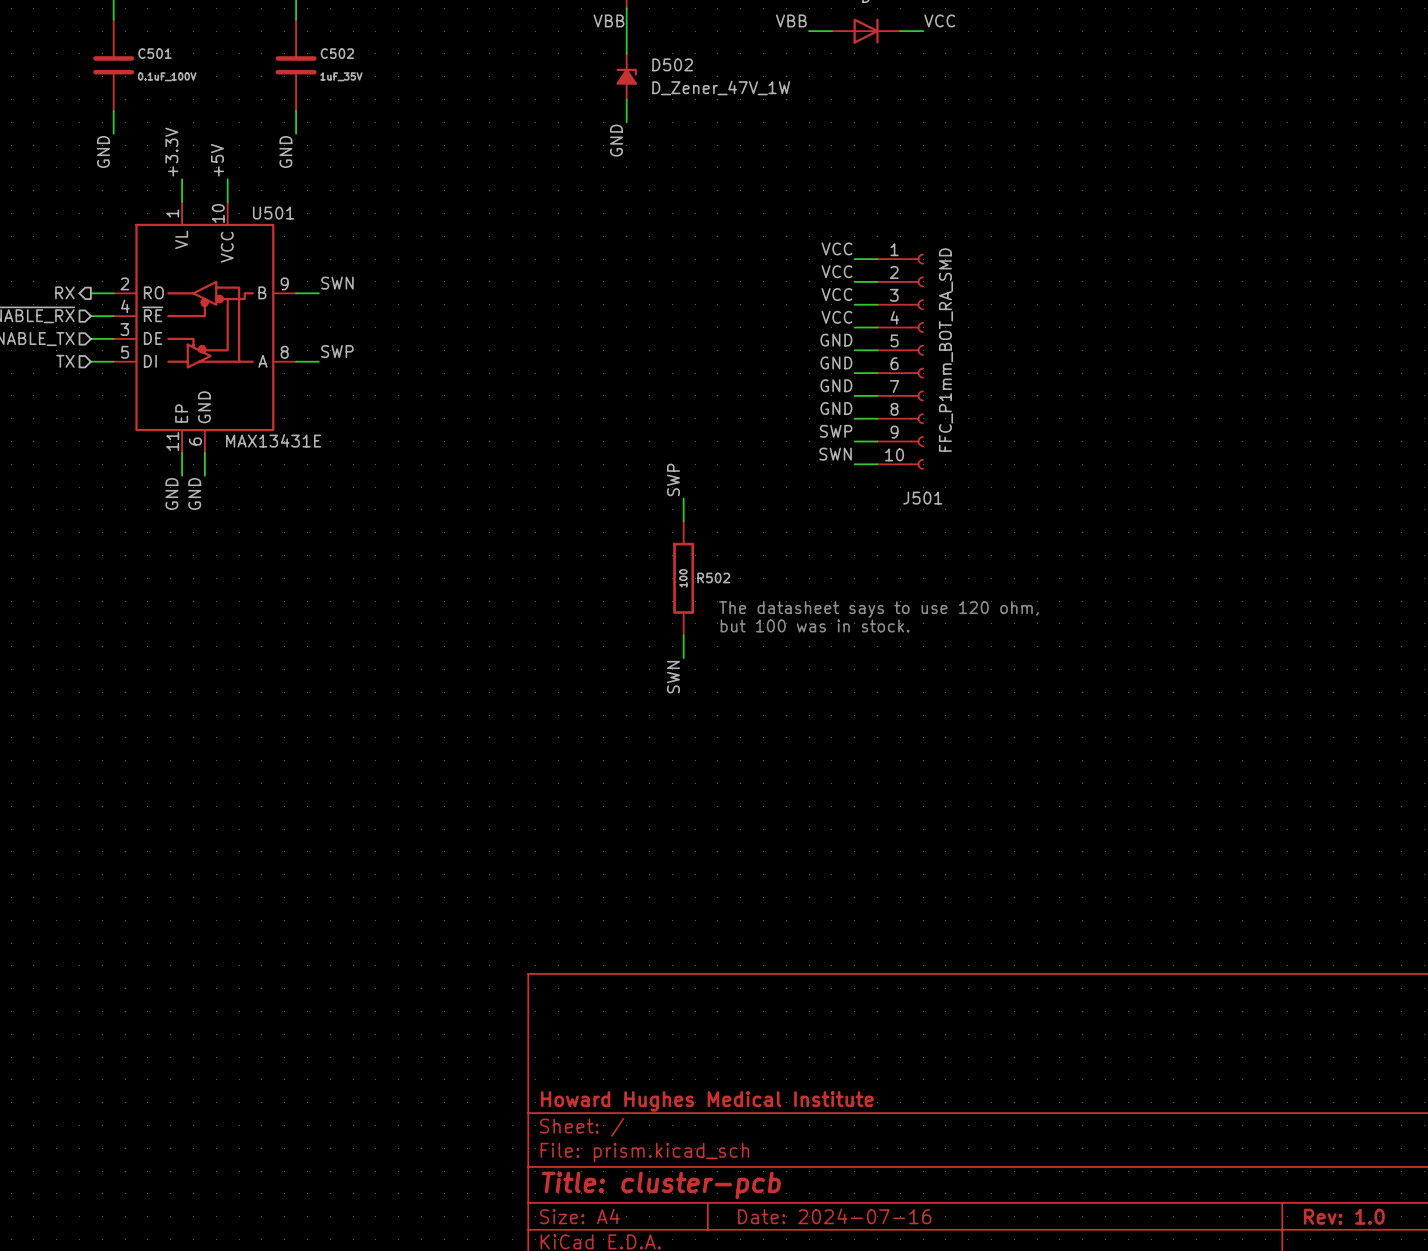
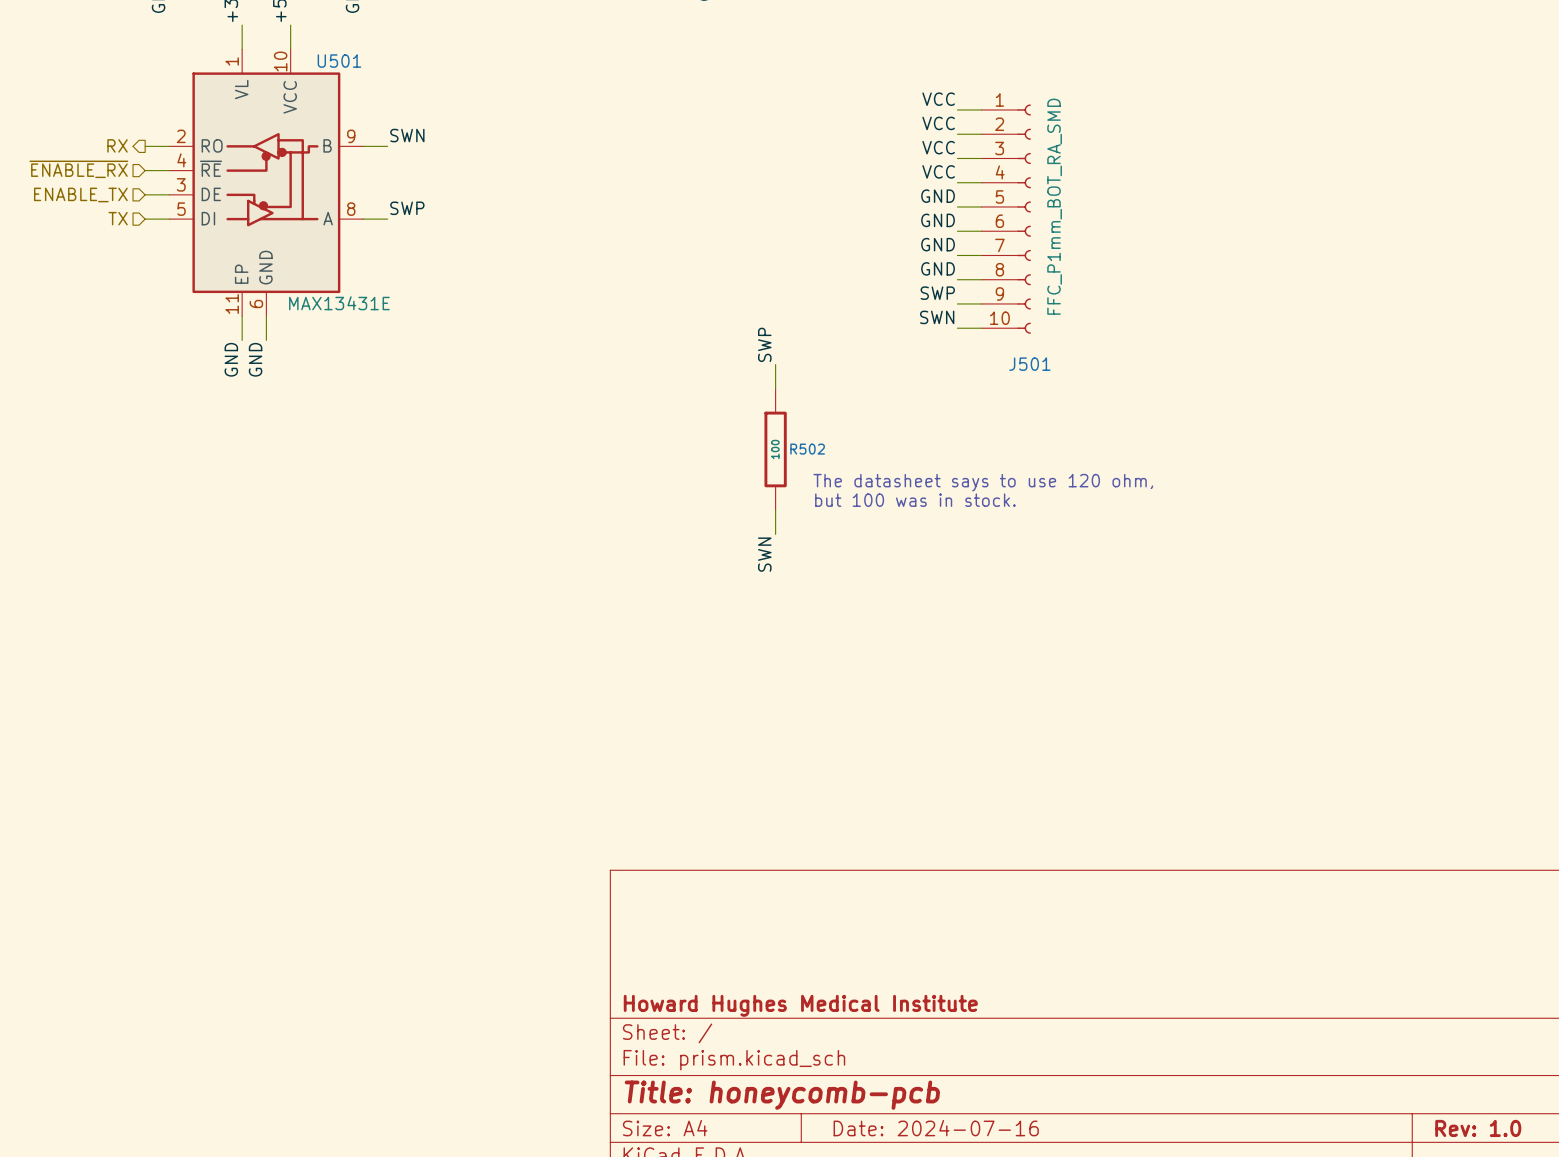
title block: Title: cluster-pcb (661, 1185) -> Title: honeycomb-pcb (782, 1095)

